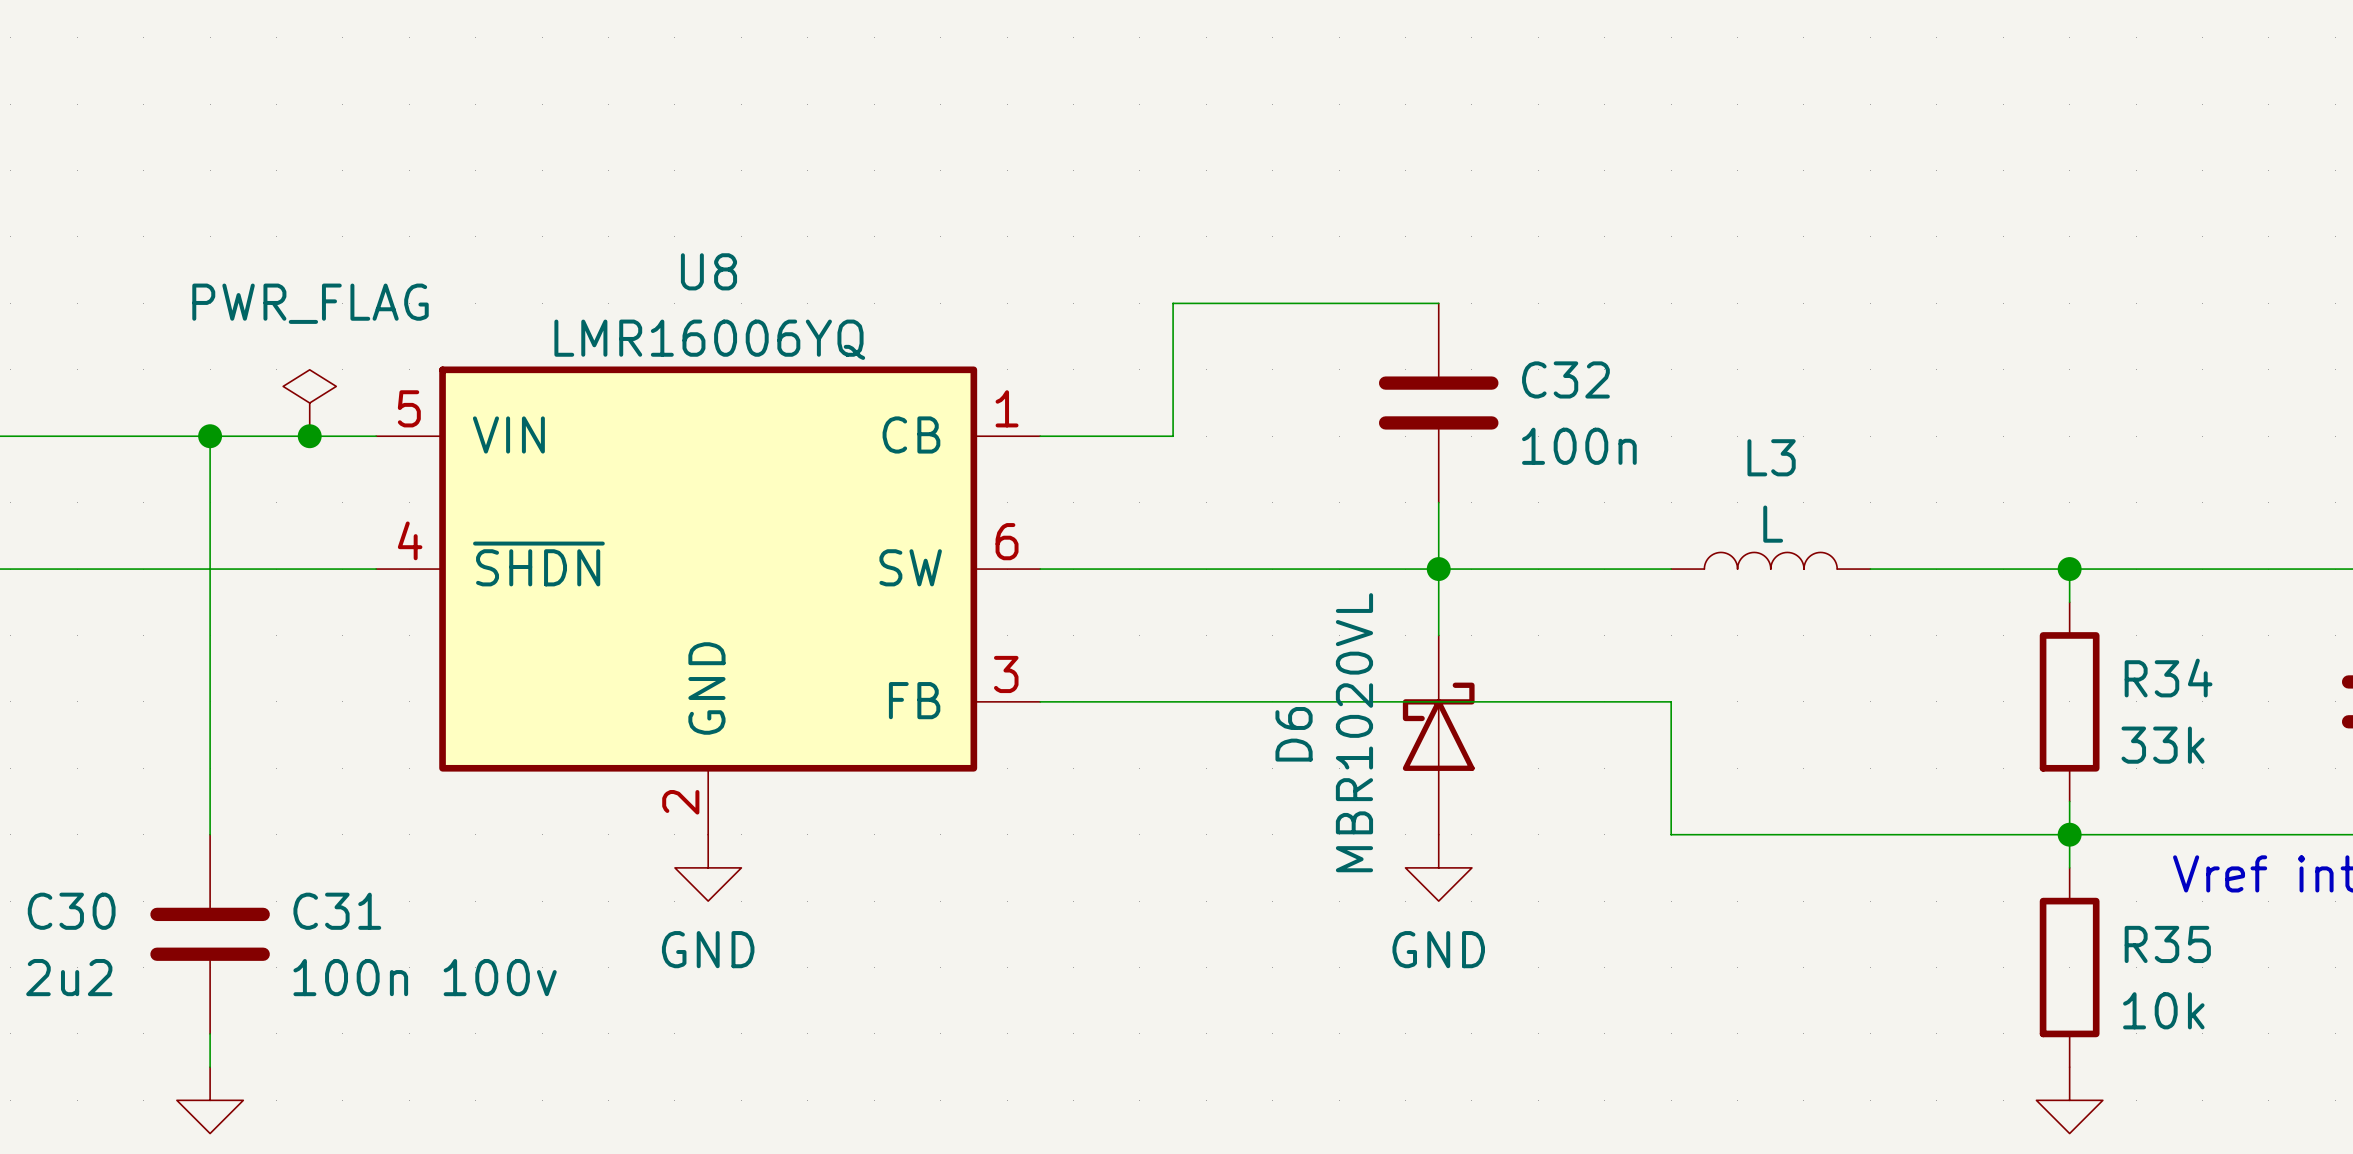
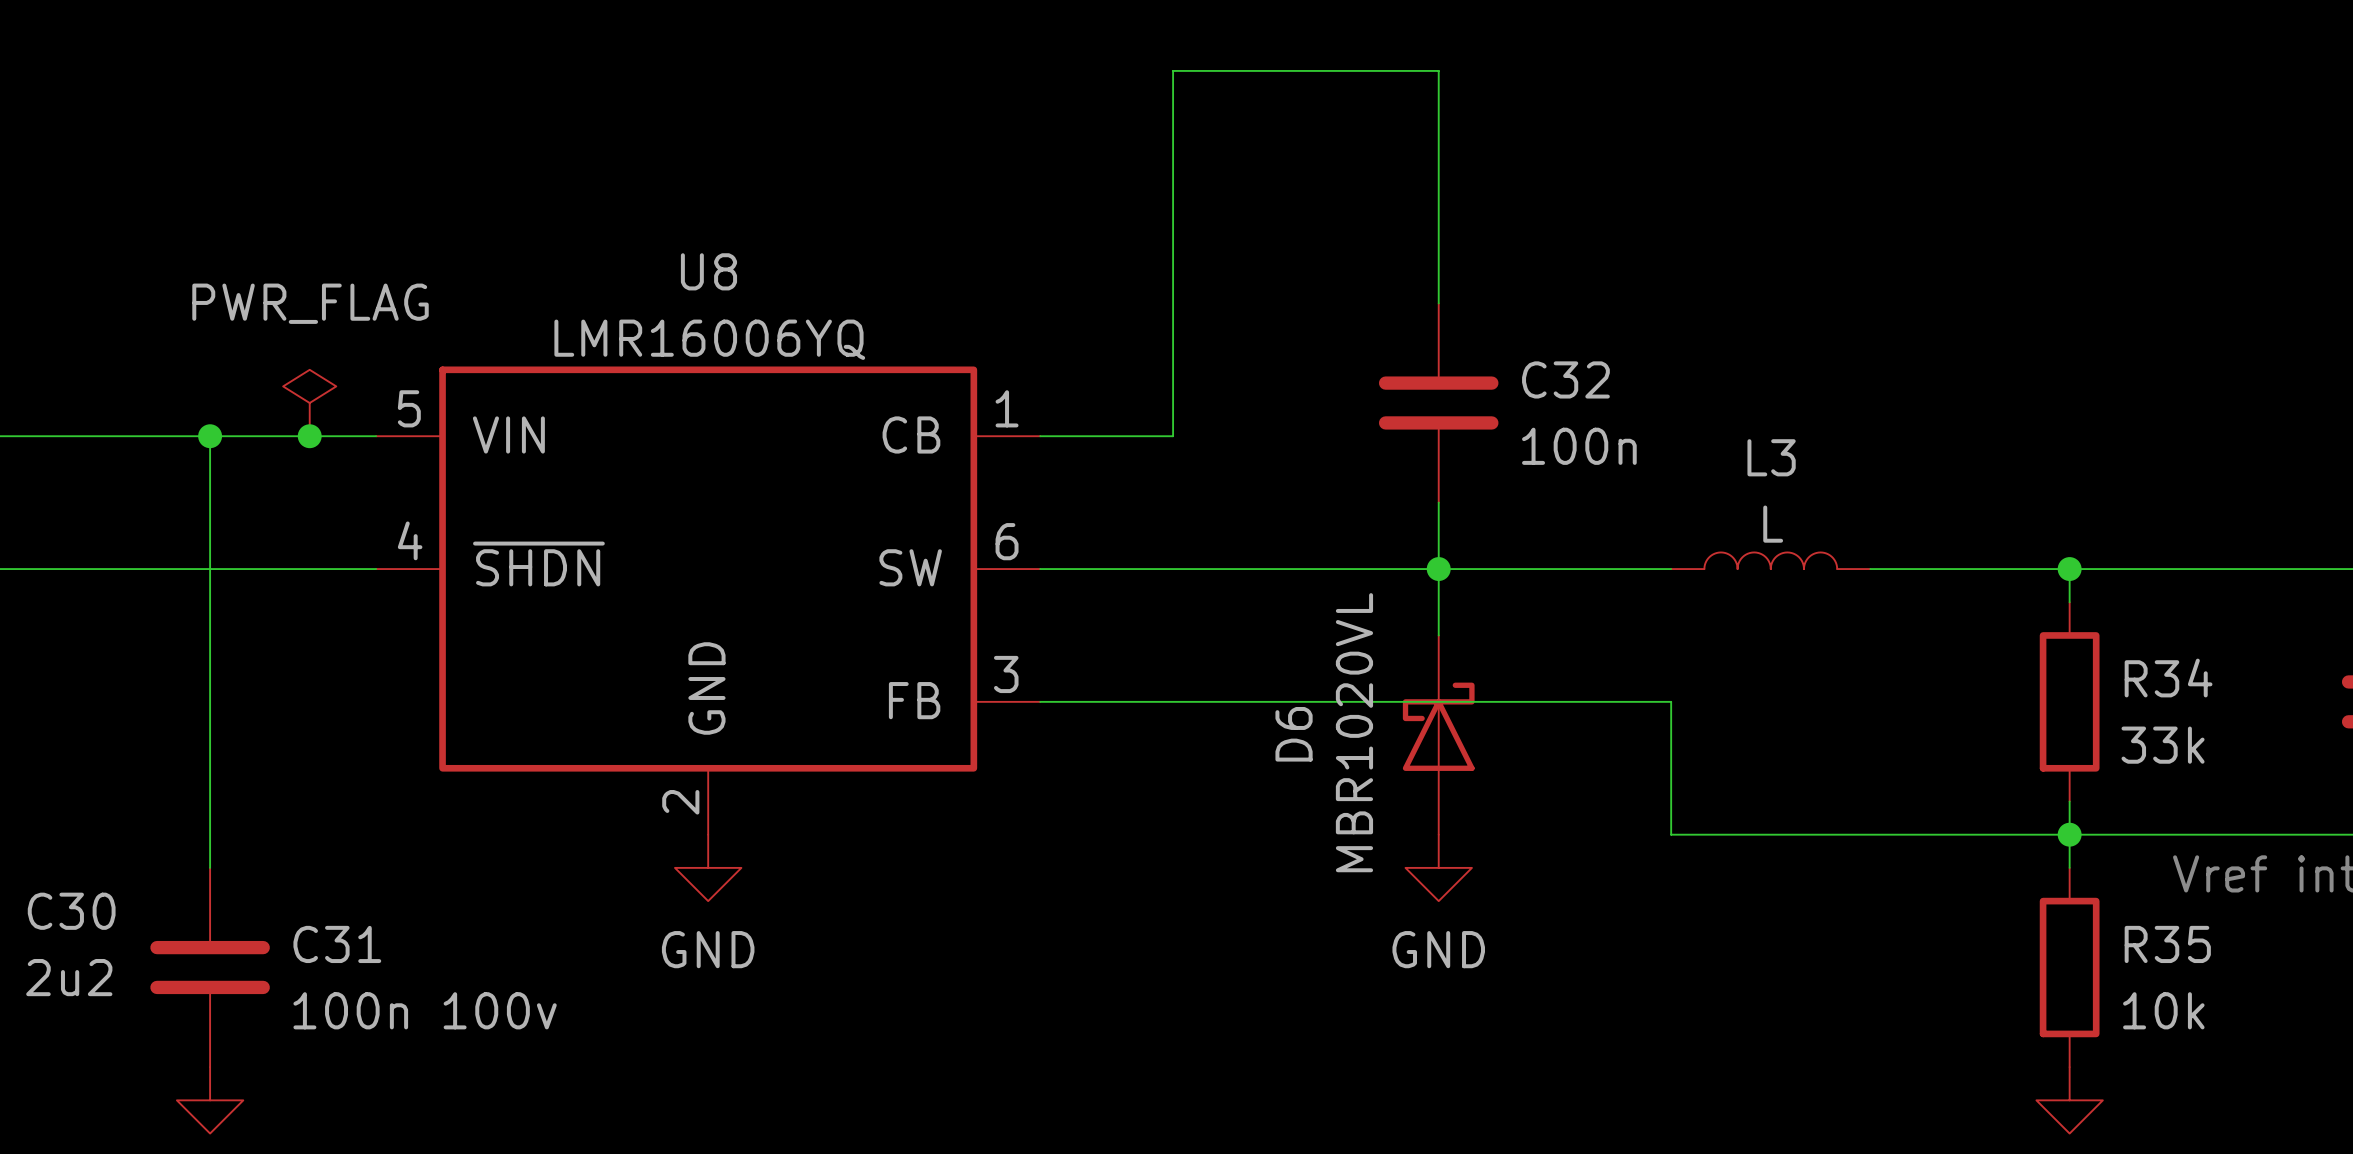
wire: (1173, 303) (1438, 303) -> (1173, 303) (1173, 70) (1438, 70) (1438, 303)
C31 position: (210, 934) -> (210, 967)

